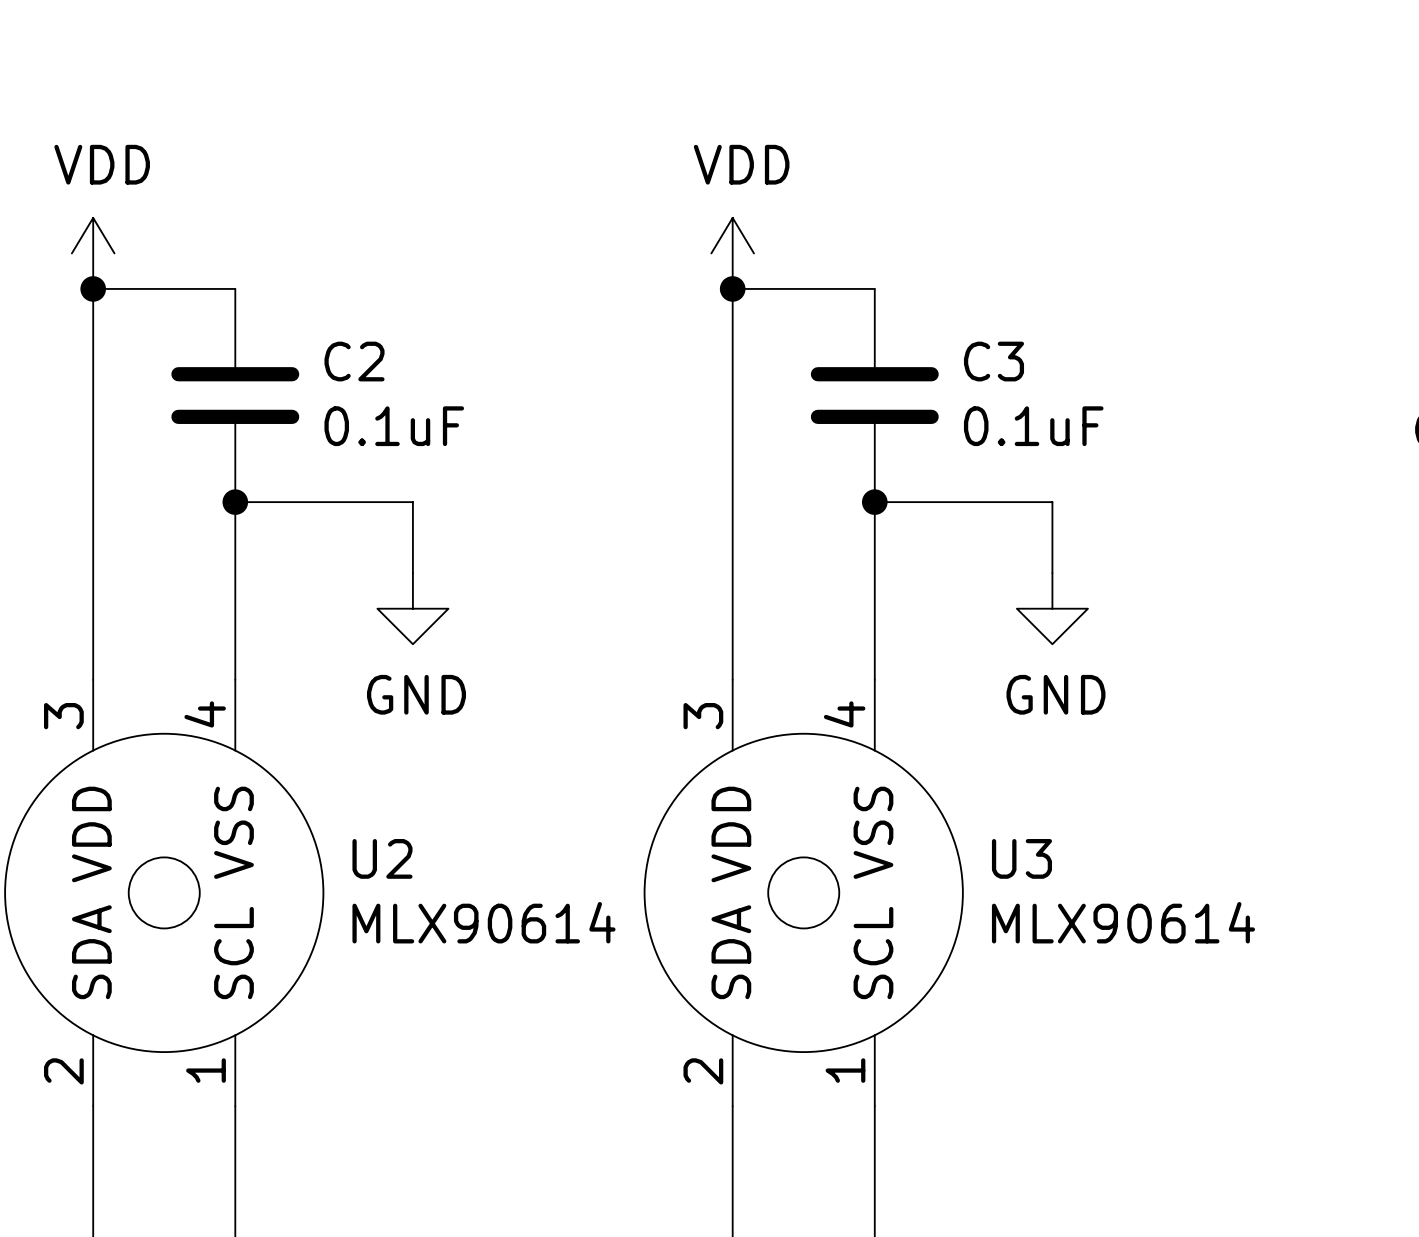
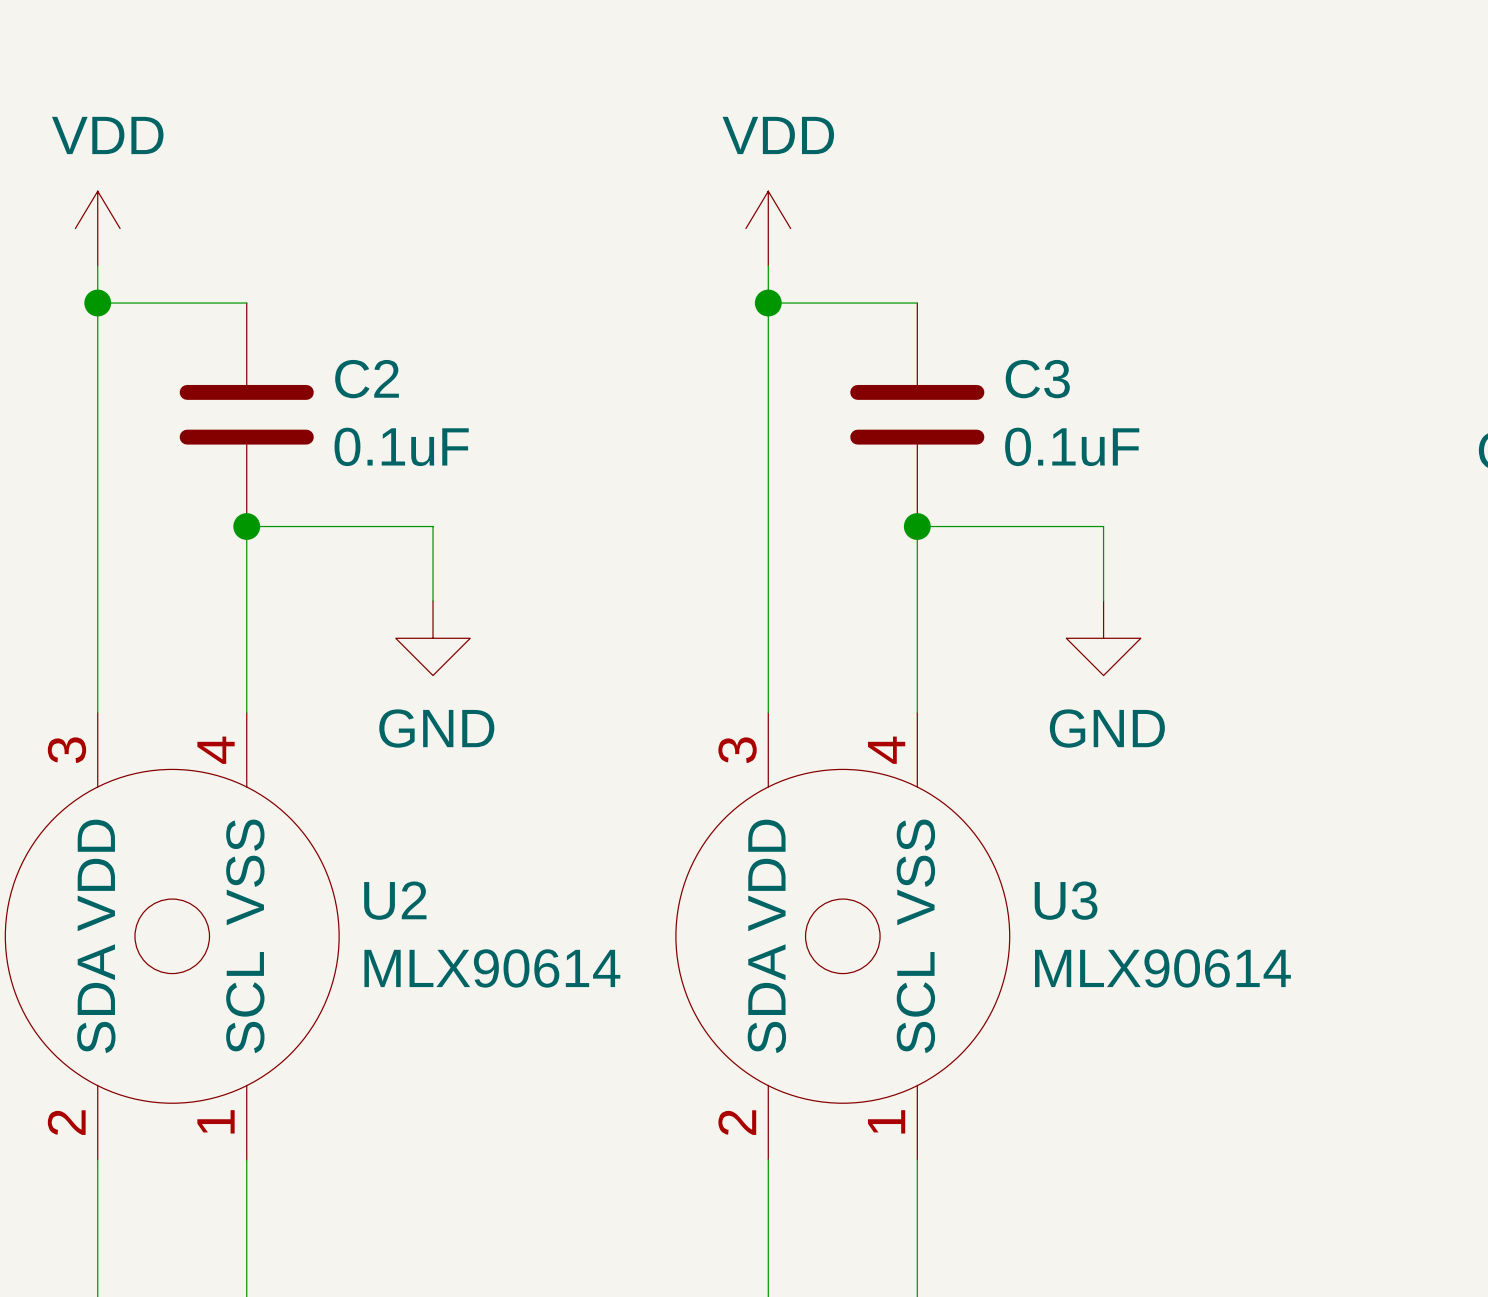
power symbol position: VDD (93, 253) -> VDD (97, 228)
power symbol position: VDD (732, 253) -> VDD (768, 228)

